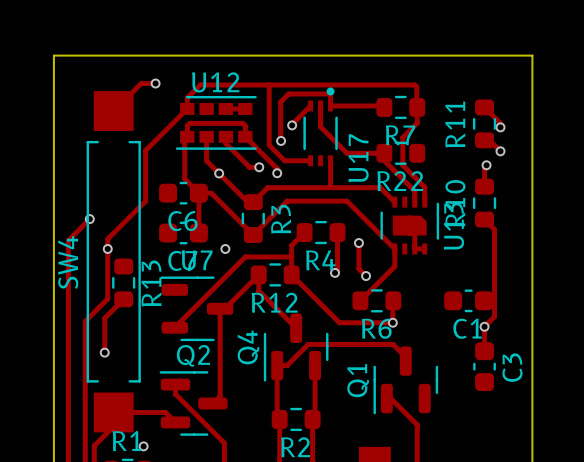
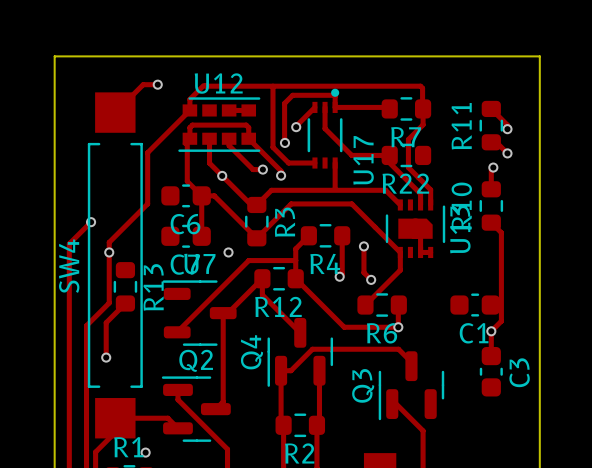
Q1 name: Q1 (358, 380) -> Q3 (363, 385)

